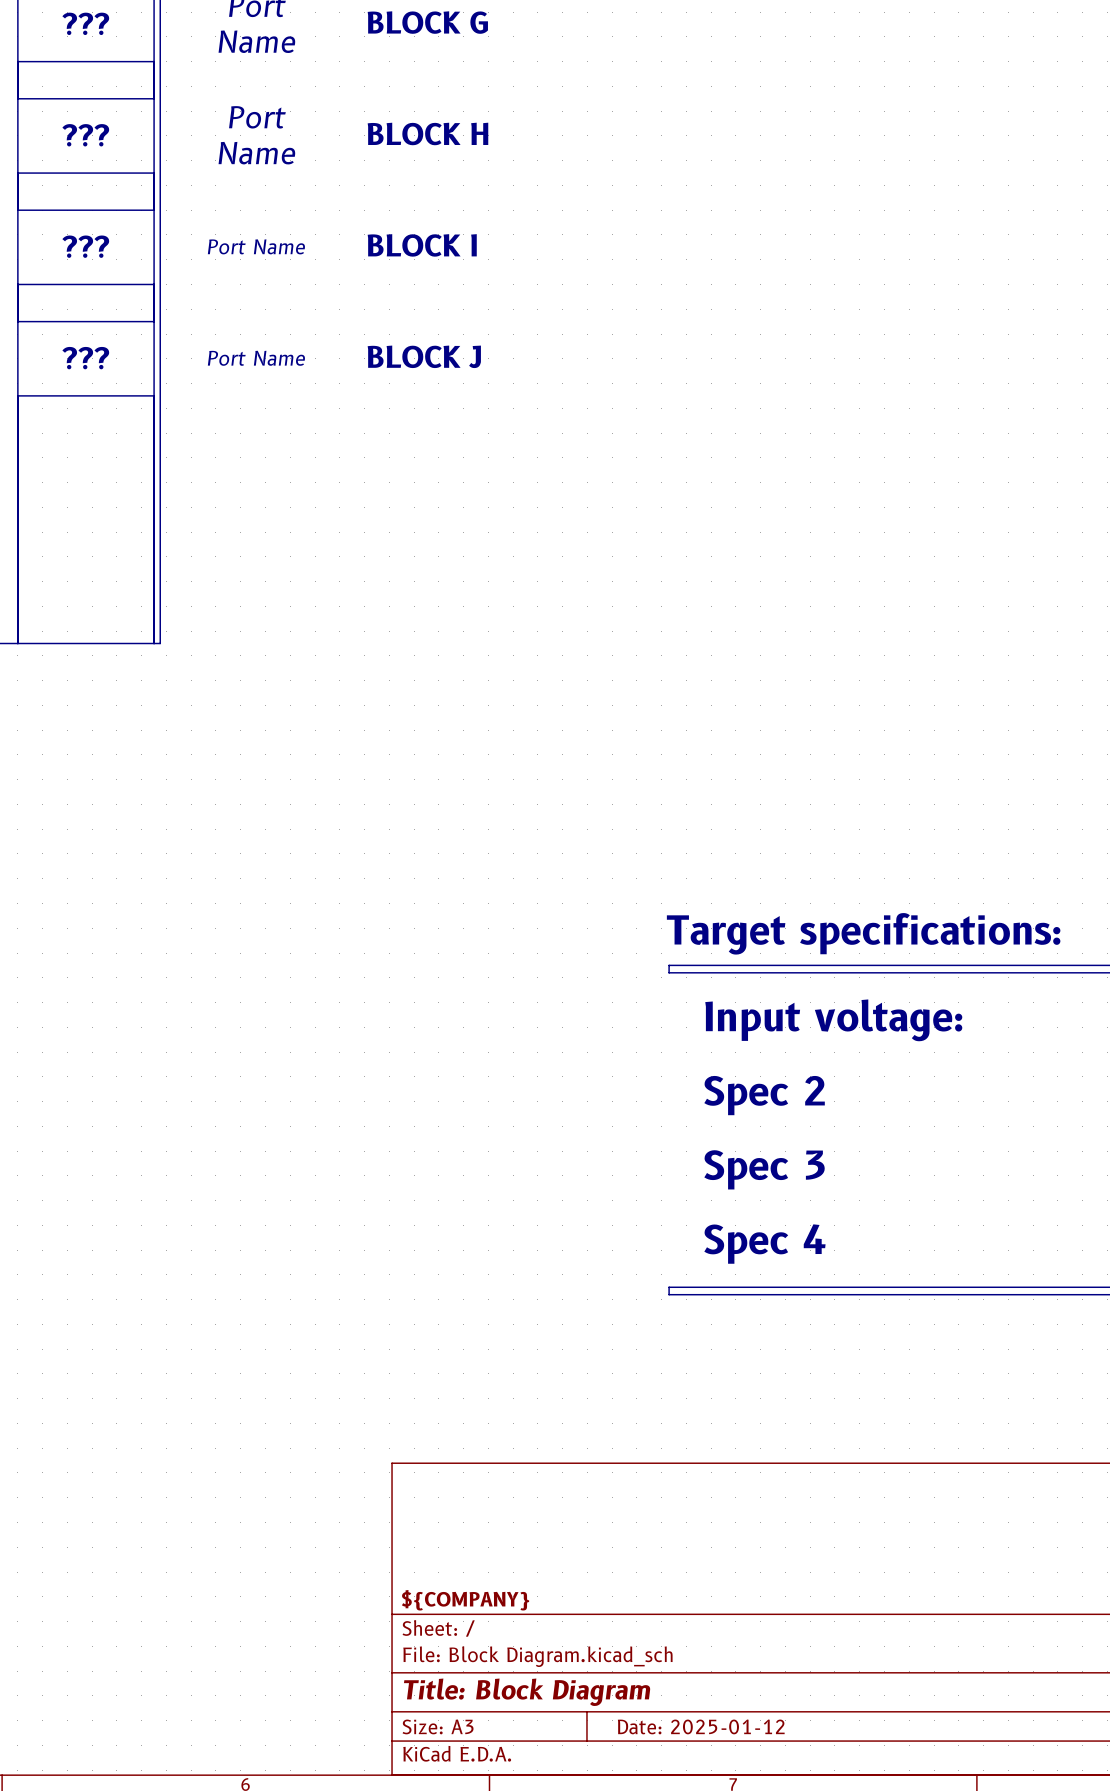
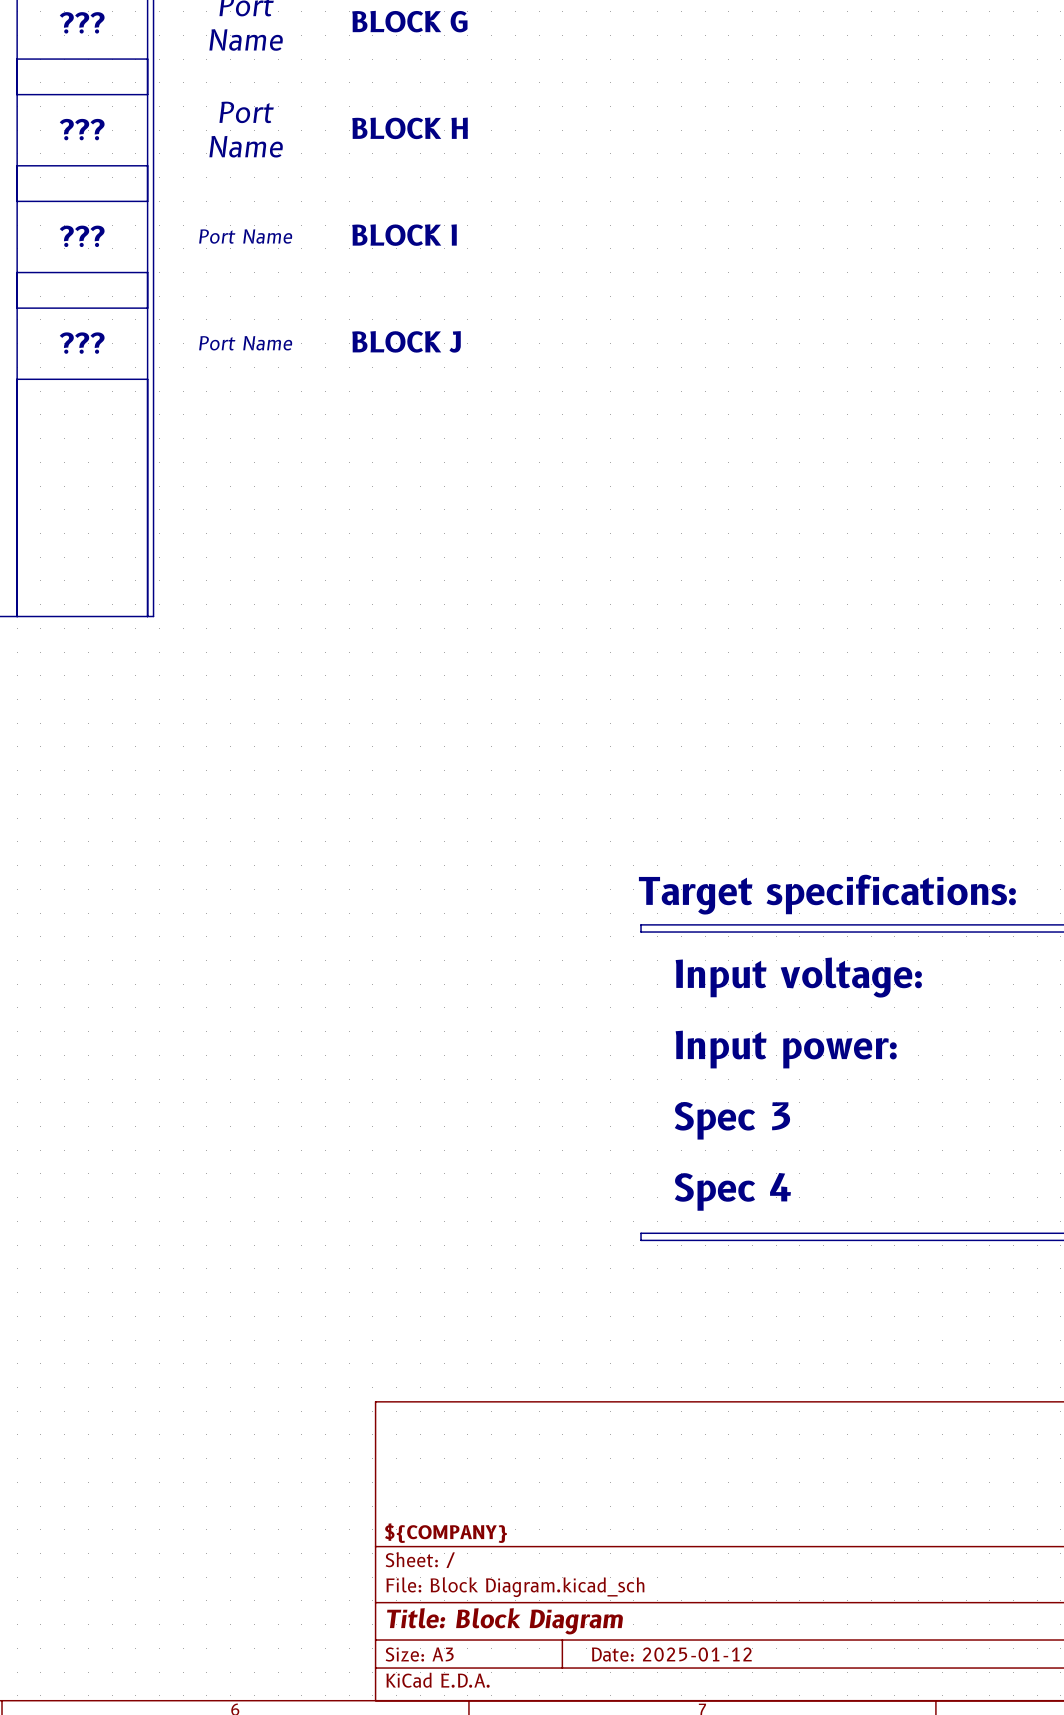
text: Spec 2 (764, 1095) -> Input power: (786, 1049)

